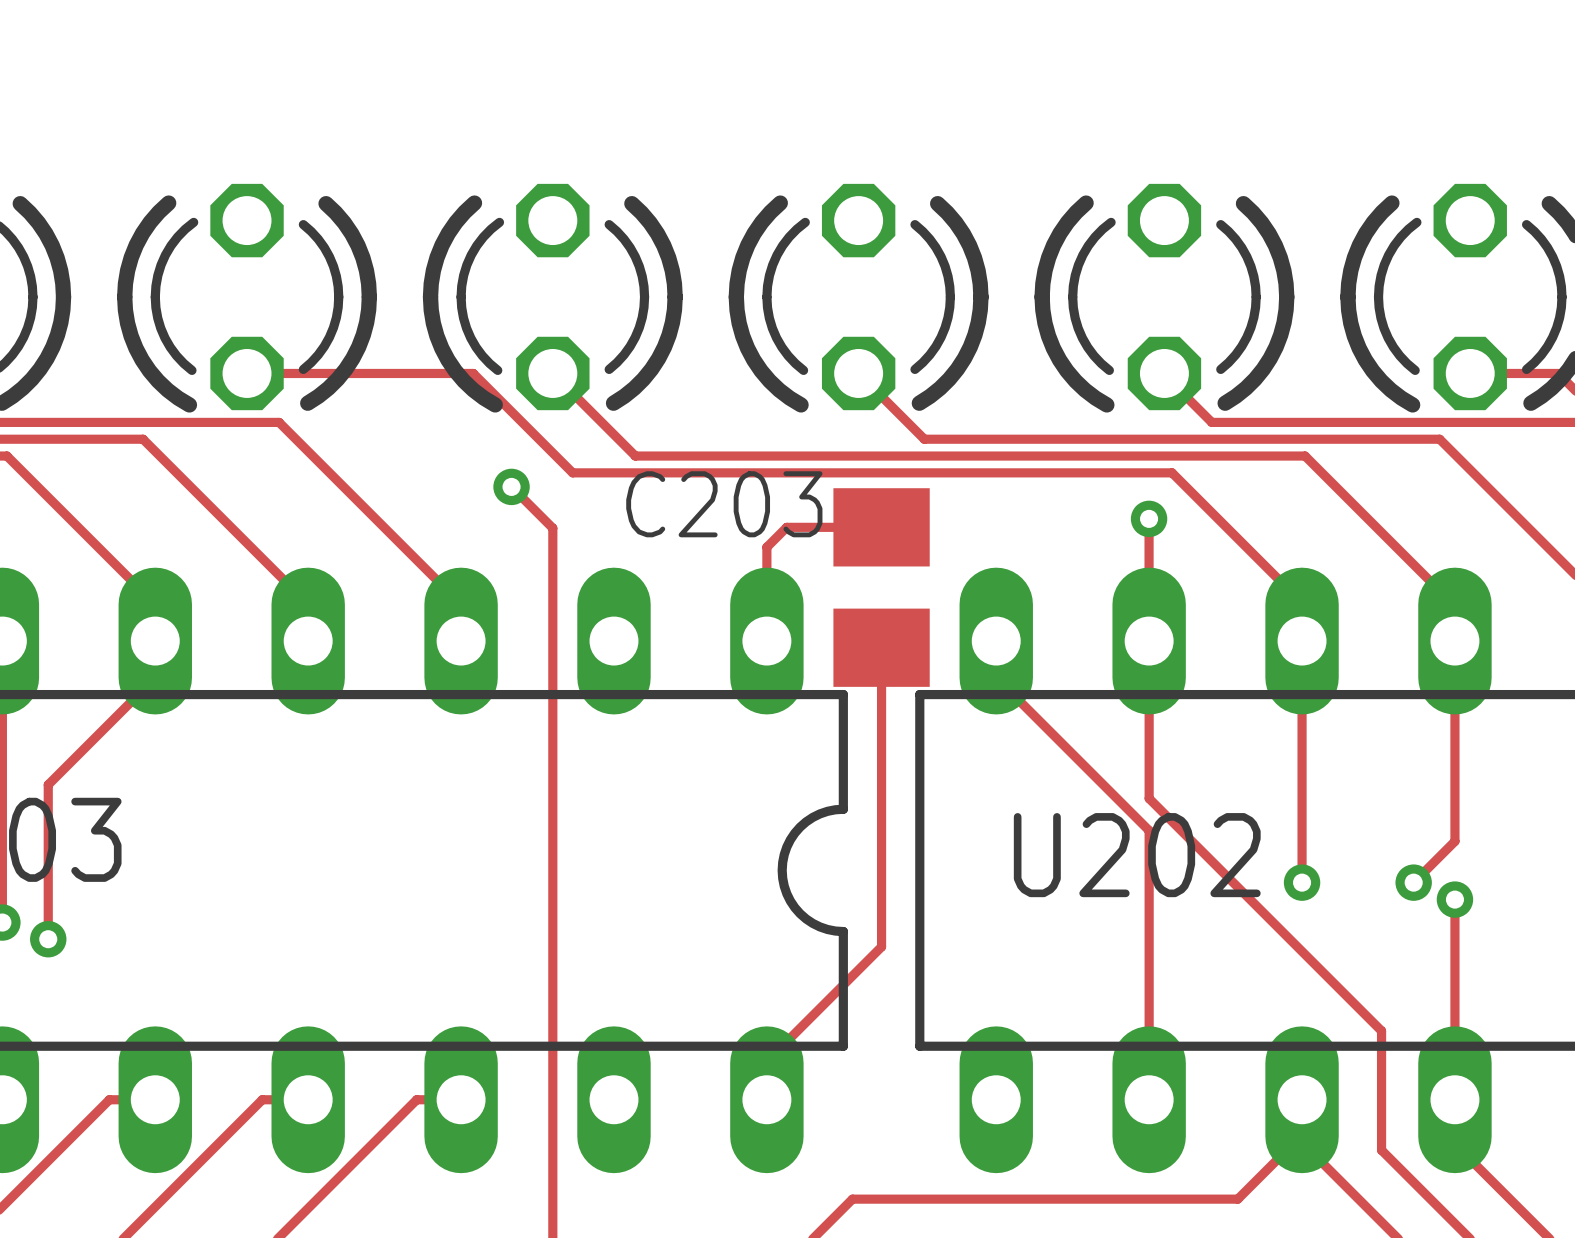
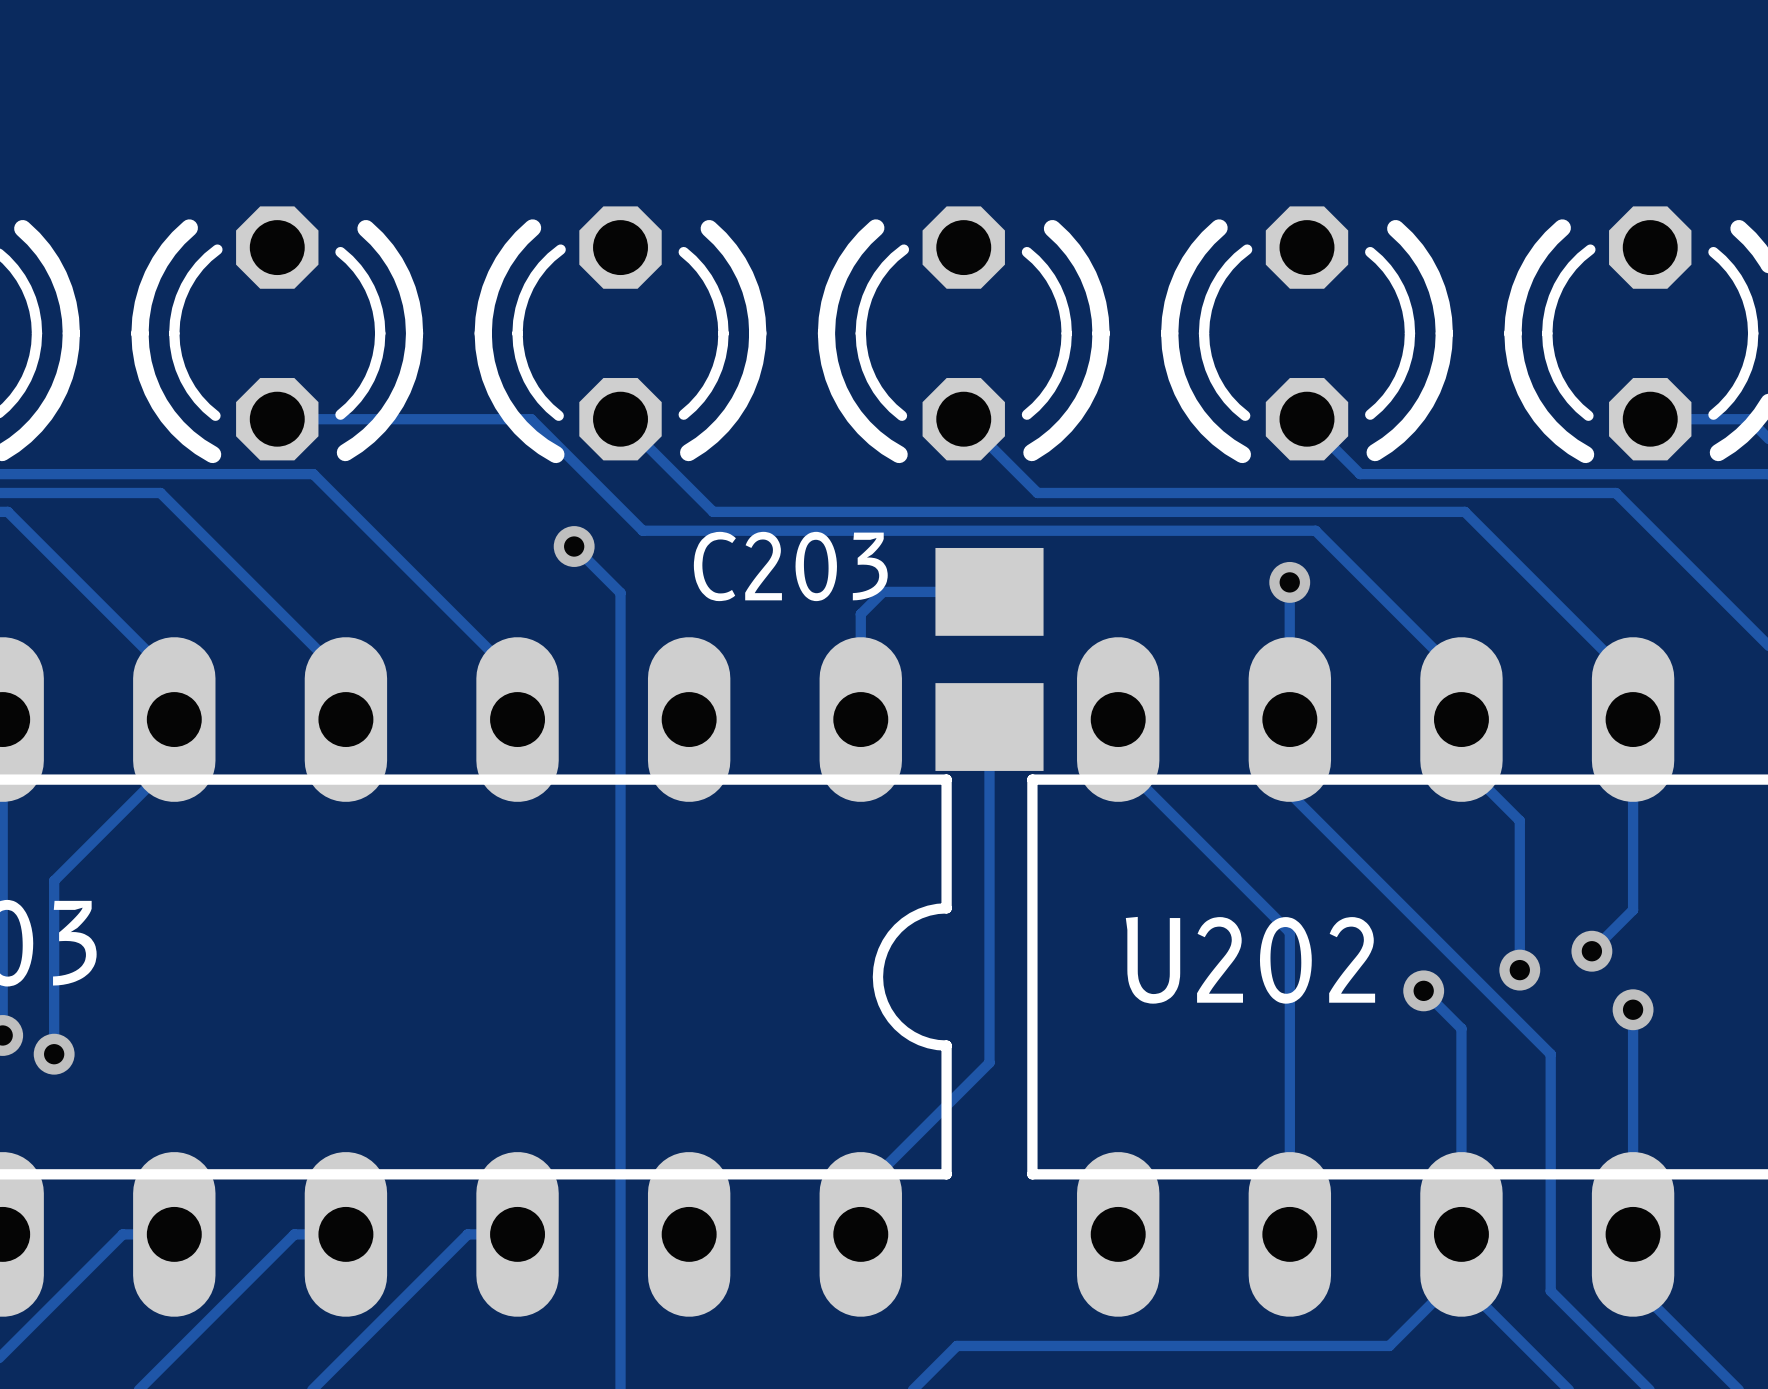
track: (1302, 679) (1302, 882) -> (1461, 762) (1519, 820) (1519, 970)
track: (1149, 706) (1149, 798) (1381, 1030) -> (1289, 793) (1550, 1054) (1550, 1157)
track: (1454, 810) (1454, 841) (1413, 882) -> (1633, 910) (1591, 951)
via: none -> (1519, 970)
track: none -> (1423, 990) (1461, 1028) (1461, 1234)
via position: (1302, 882) -> (1423, 990)
via position: (1413, 882) -> (1591, 951)

